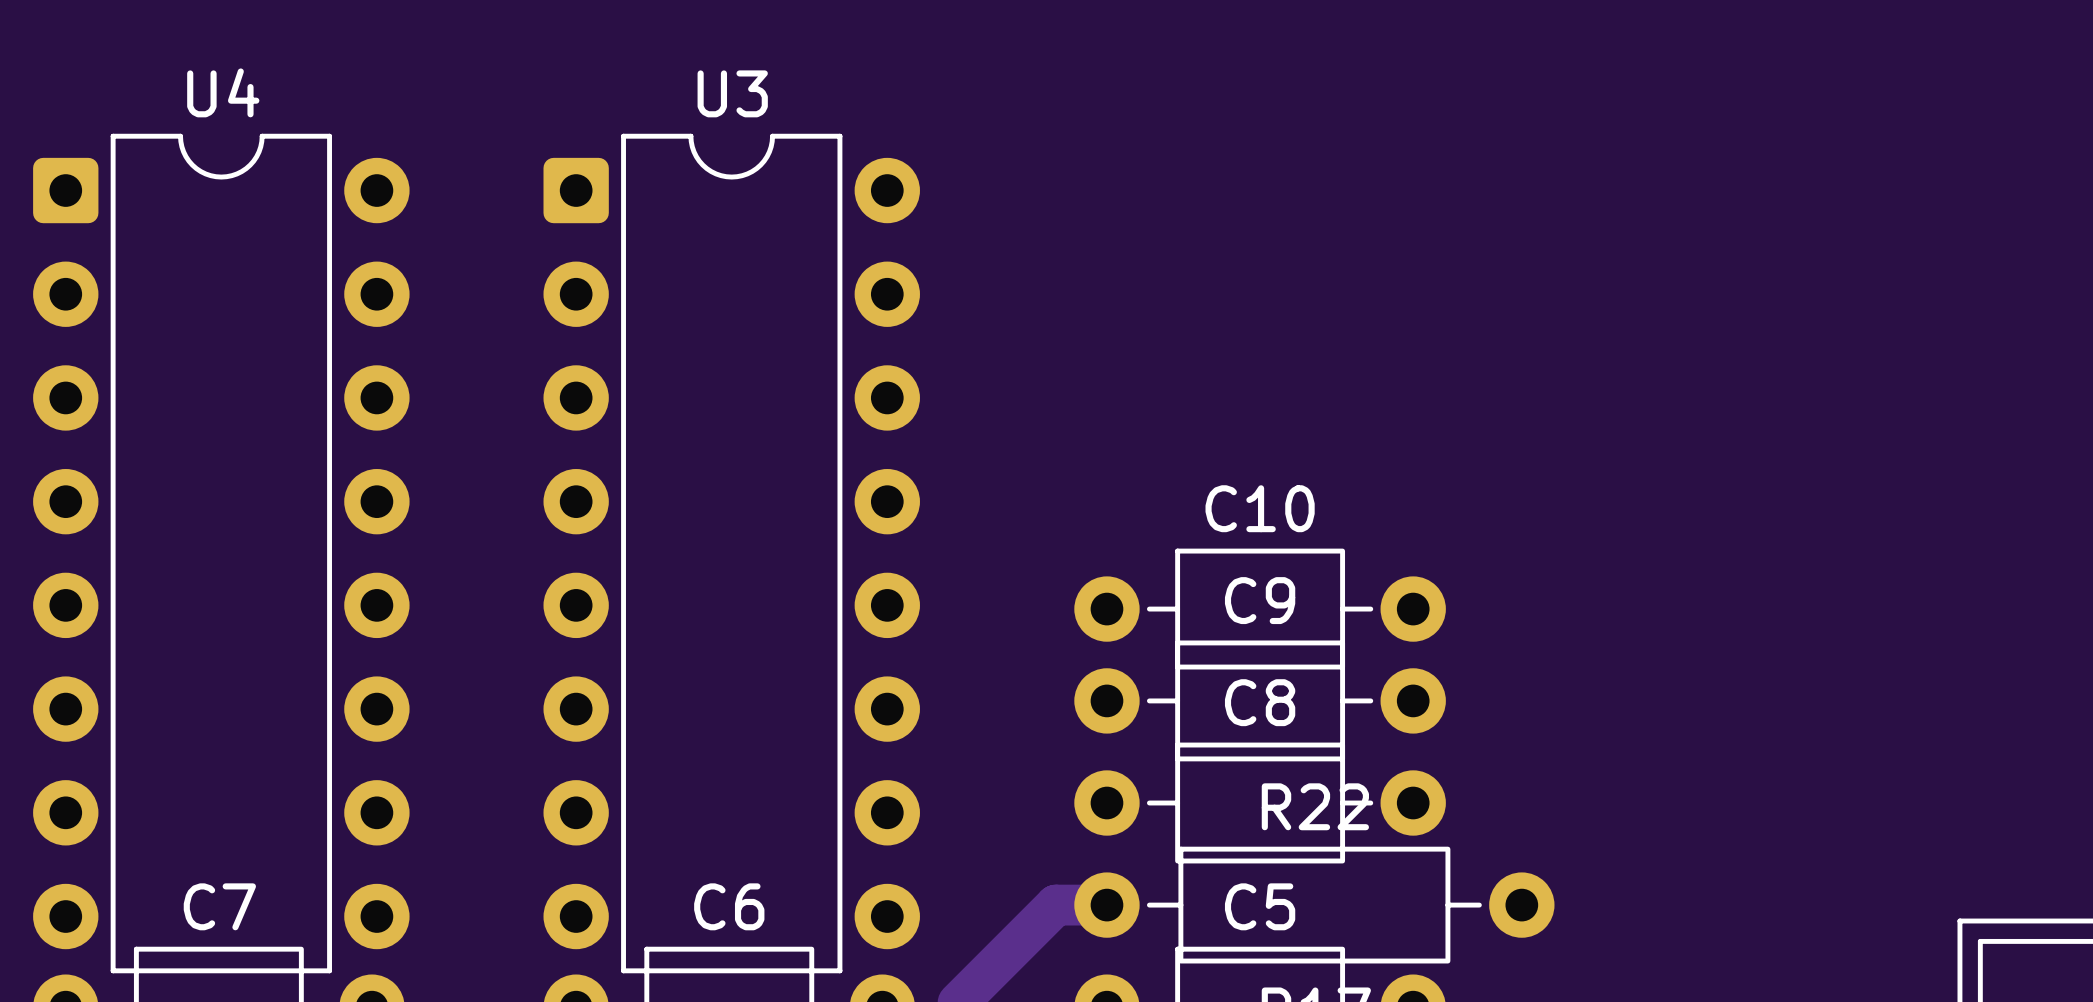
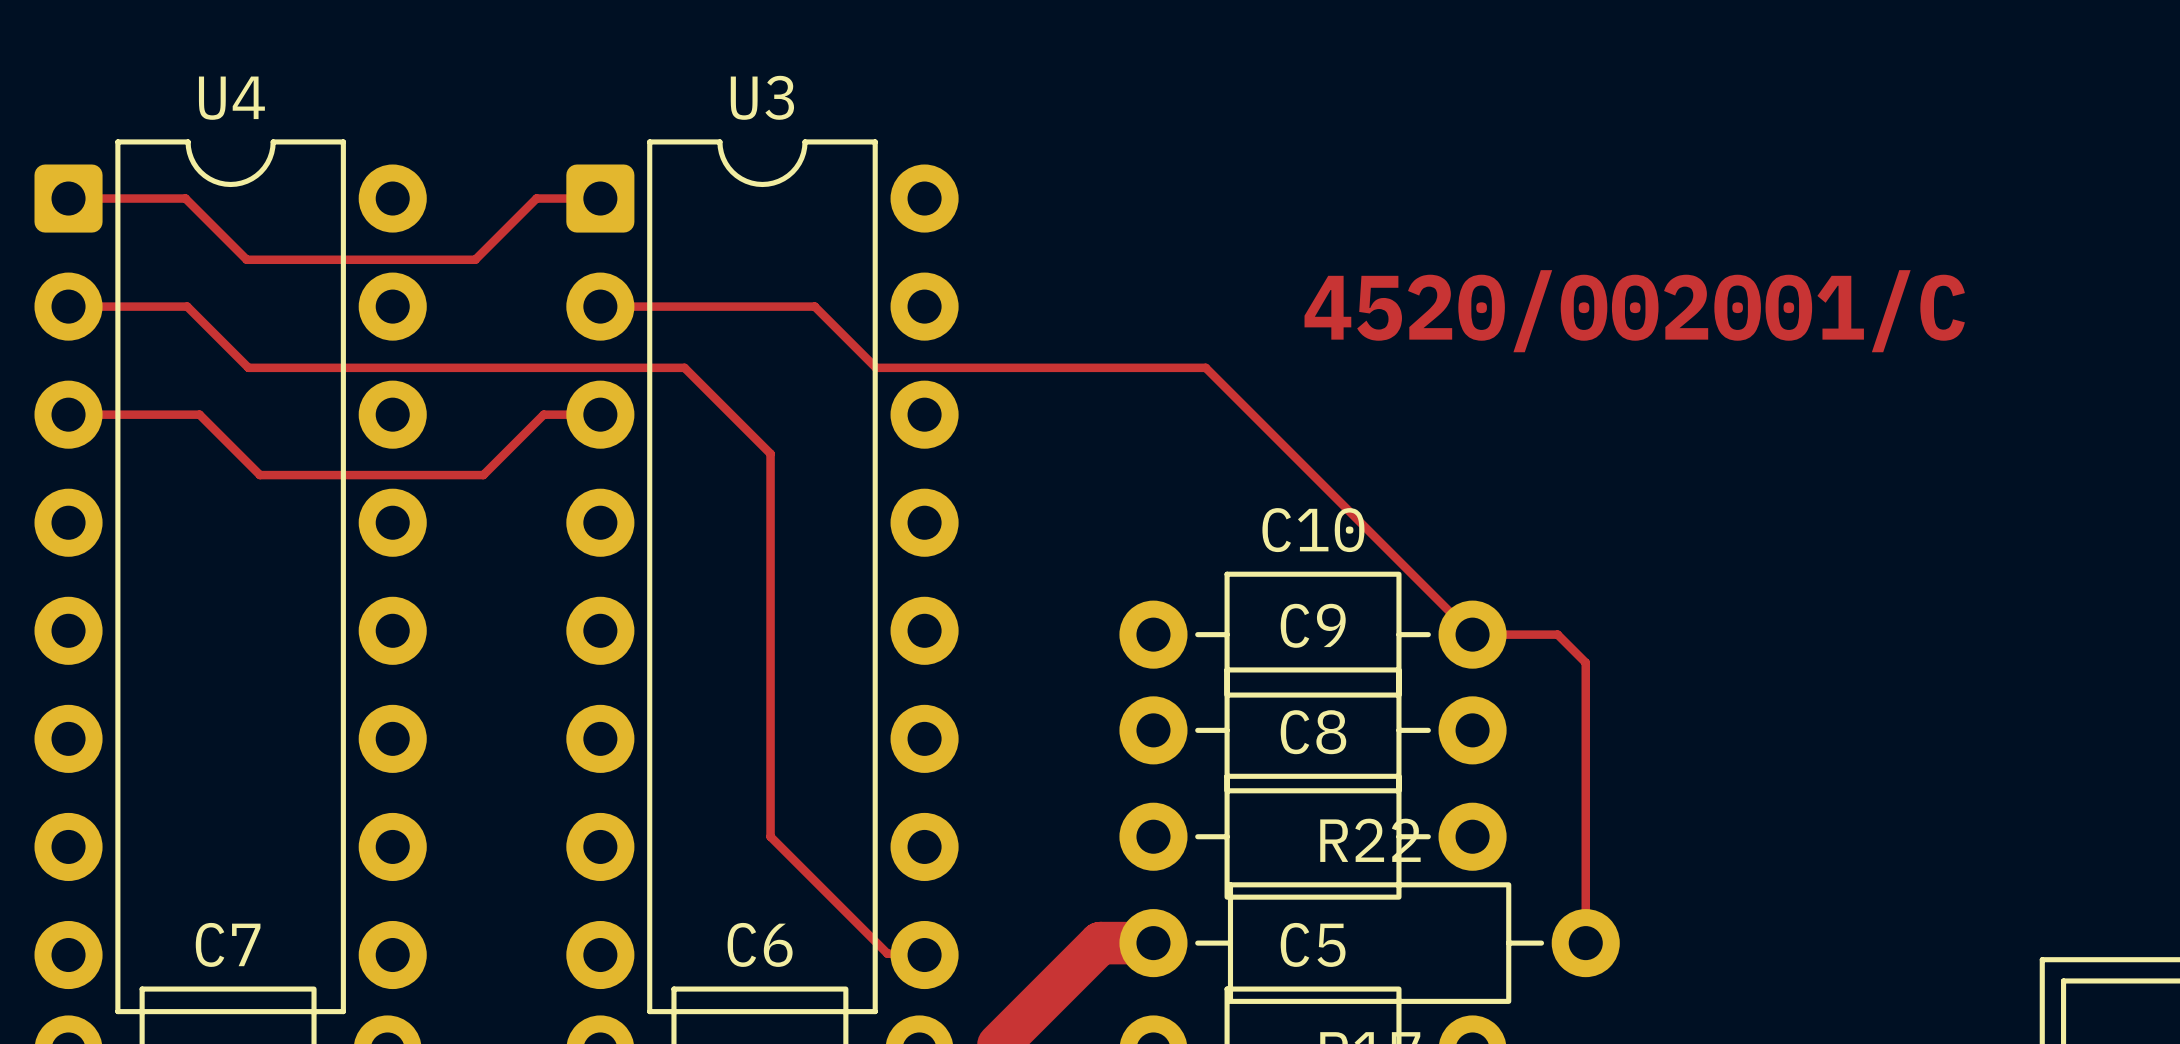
track: none -> (68, 198) (185, 198) (246, 259) (475, 259) (536, 198) (600, 198)
track: none -> (68, 306) (187, 306) (248, 367) (684, 367) (770, 453) (770, 836) (887, 953) (924, 955)
track: none -> (600, 306) (814, 306) (876, 367) (1205, 367) (1472, 634) (1557, 634) (1585, 662) (1585, 943)
text: none -> 4520/002001/C (1634, 311)
track: none -> (68, 414) (199, 414) (259, 475) (483, 475) (543, 414) (600, 414)

